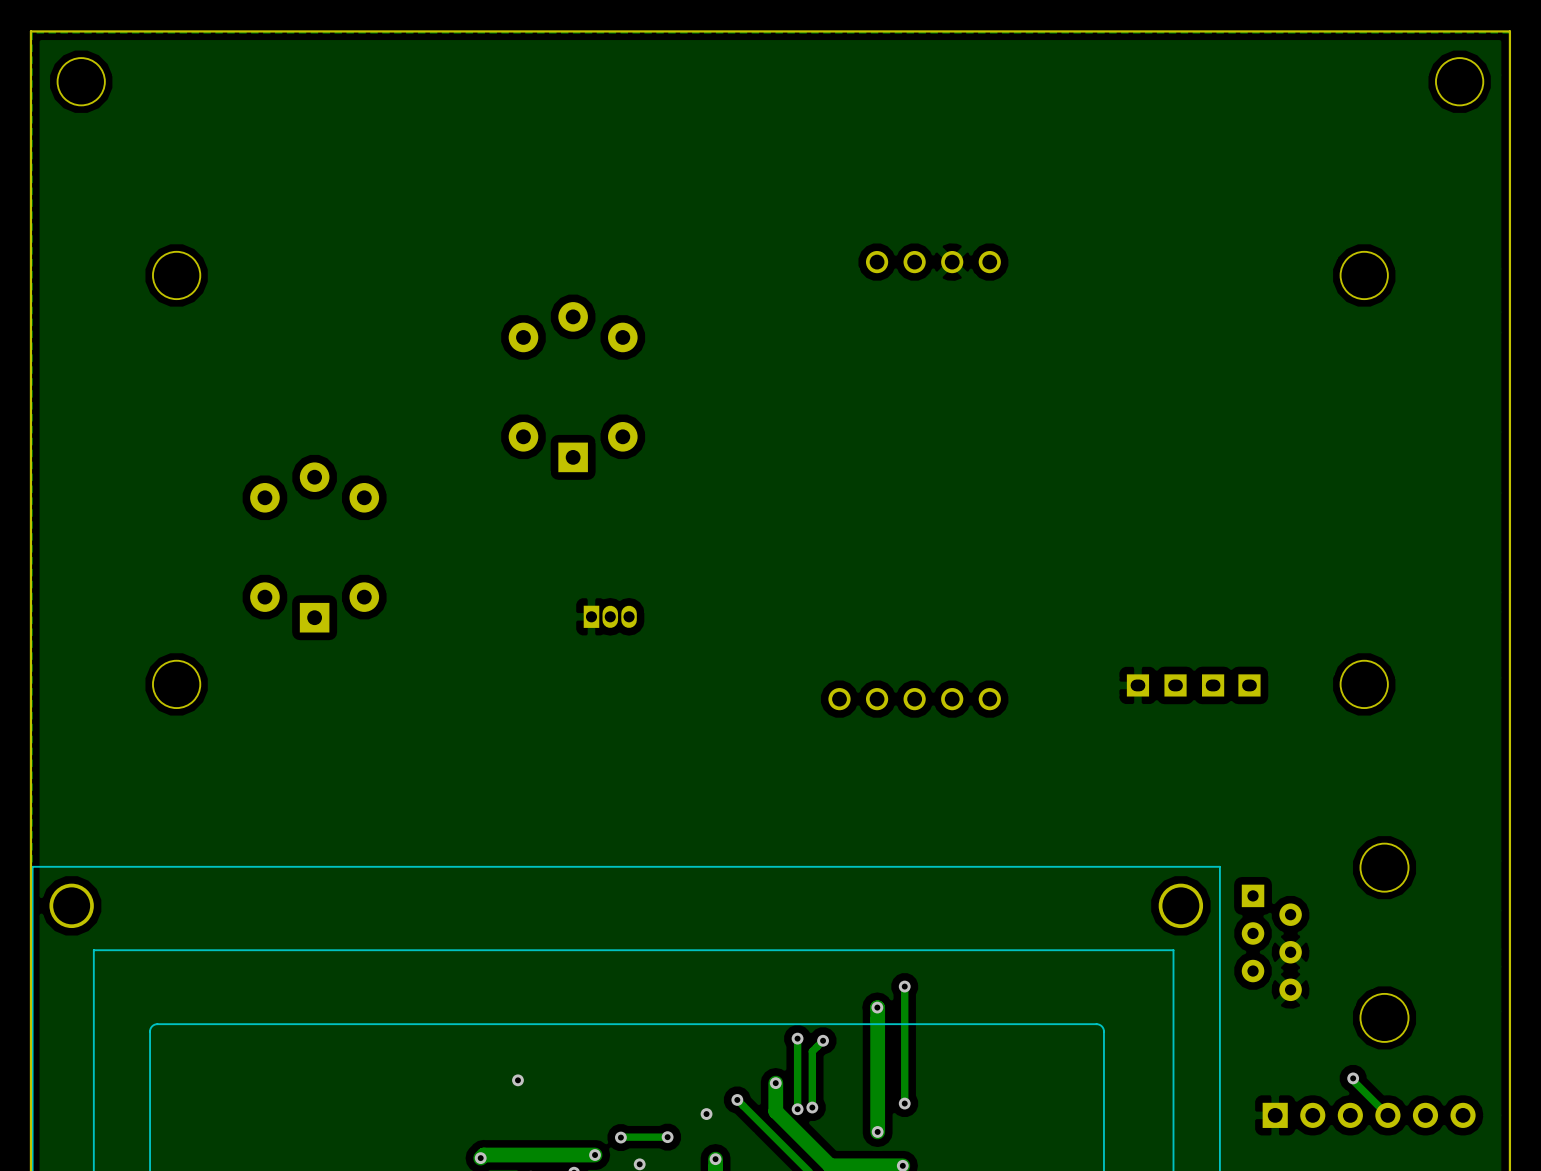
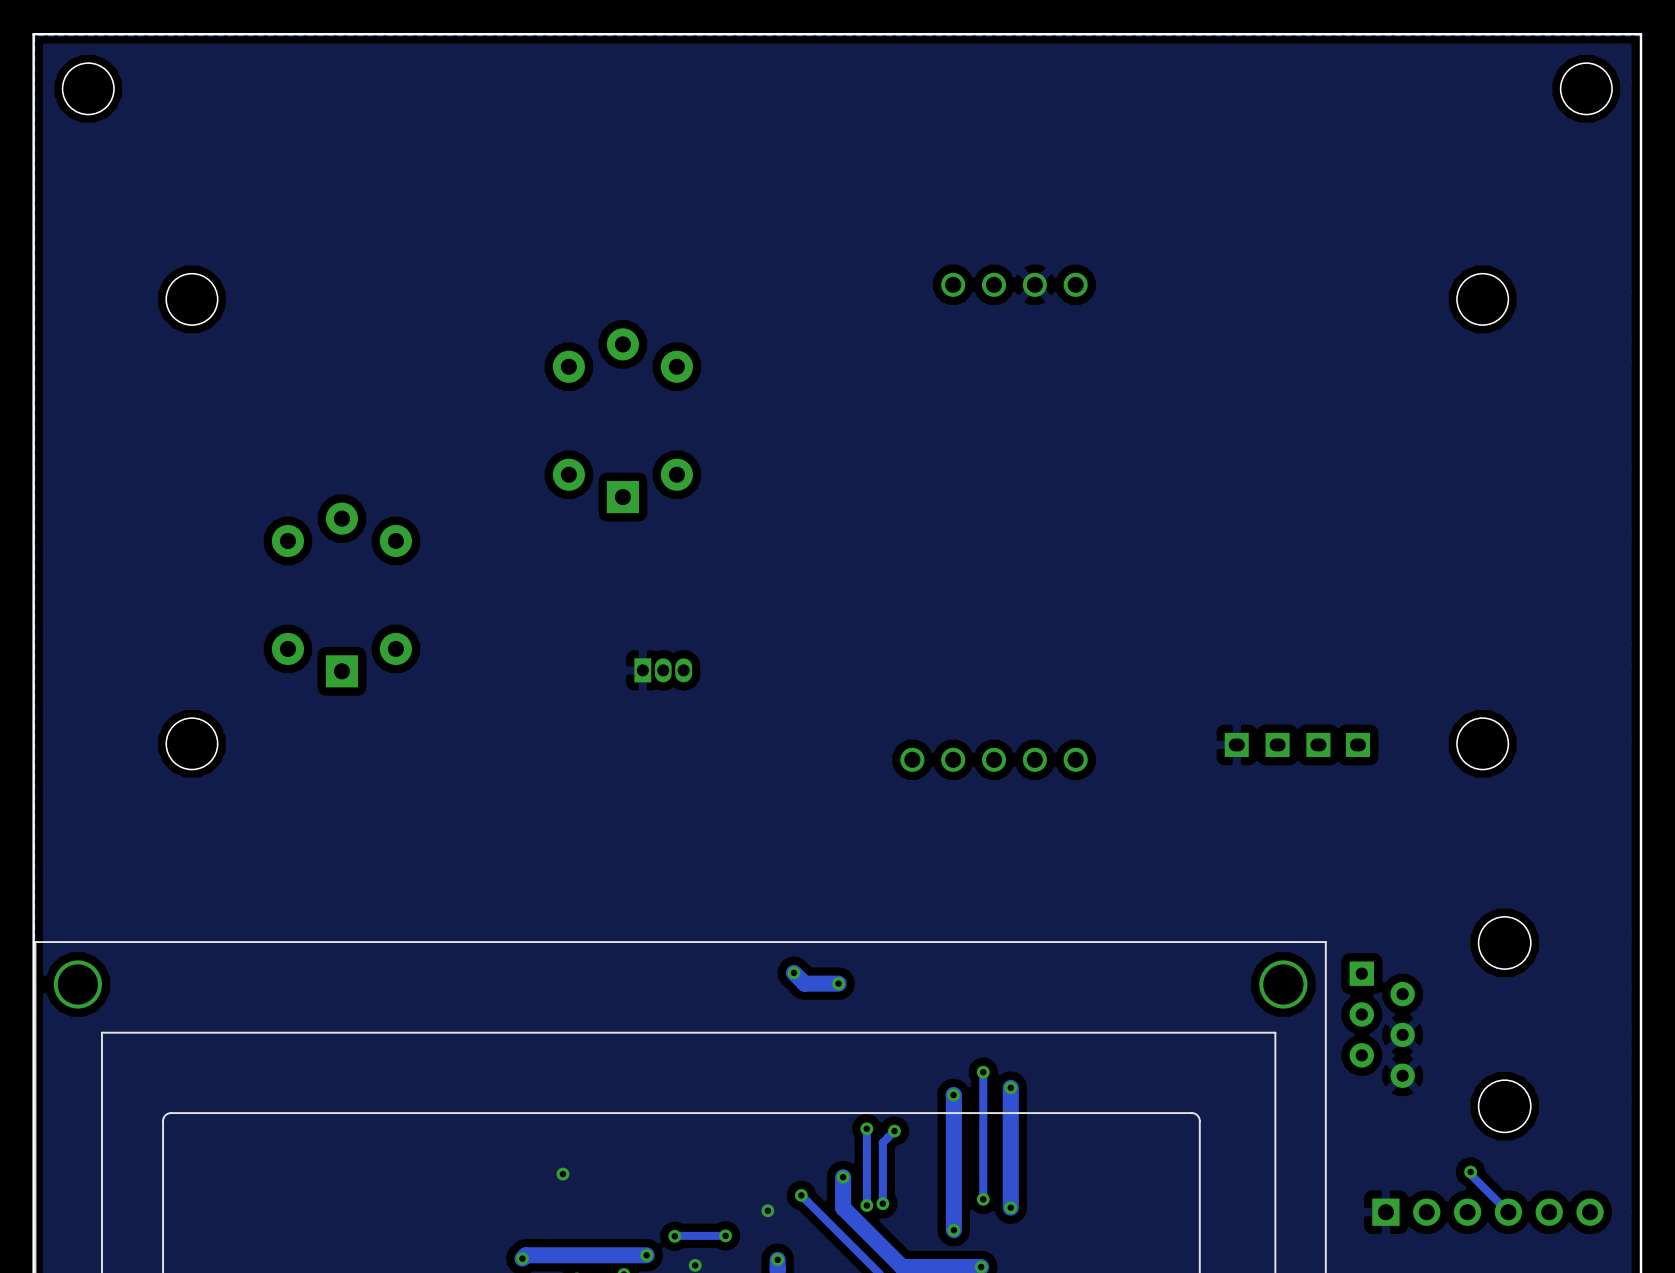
track: none -> (793, 972) (804, 983) (838, 983)
via: none -> (793, 972)
via: none -> (838, 983)
track: none -> (1010, 1087) (1010, 1207)
via: none -> (1010, 1087)
via: none -> (1010, 1207)

